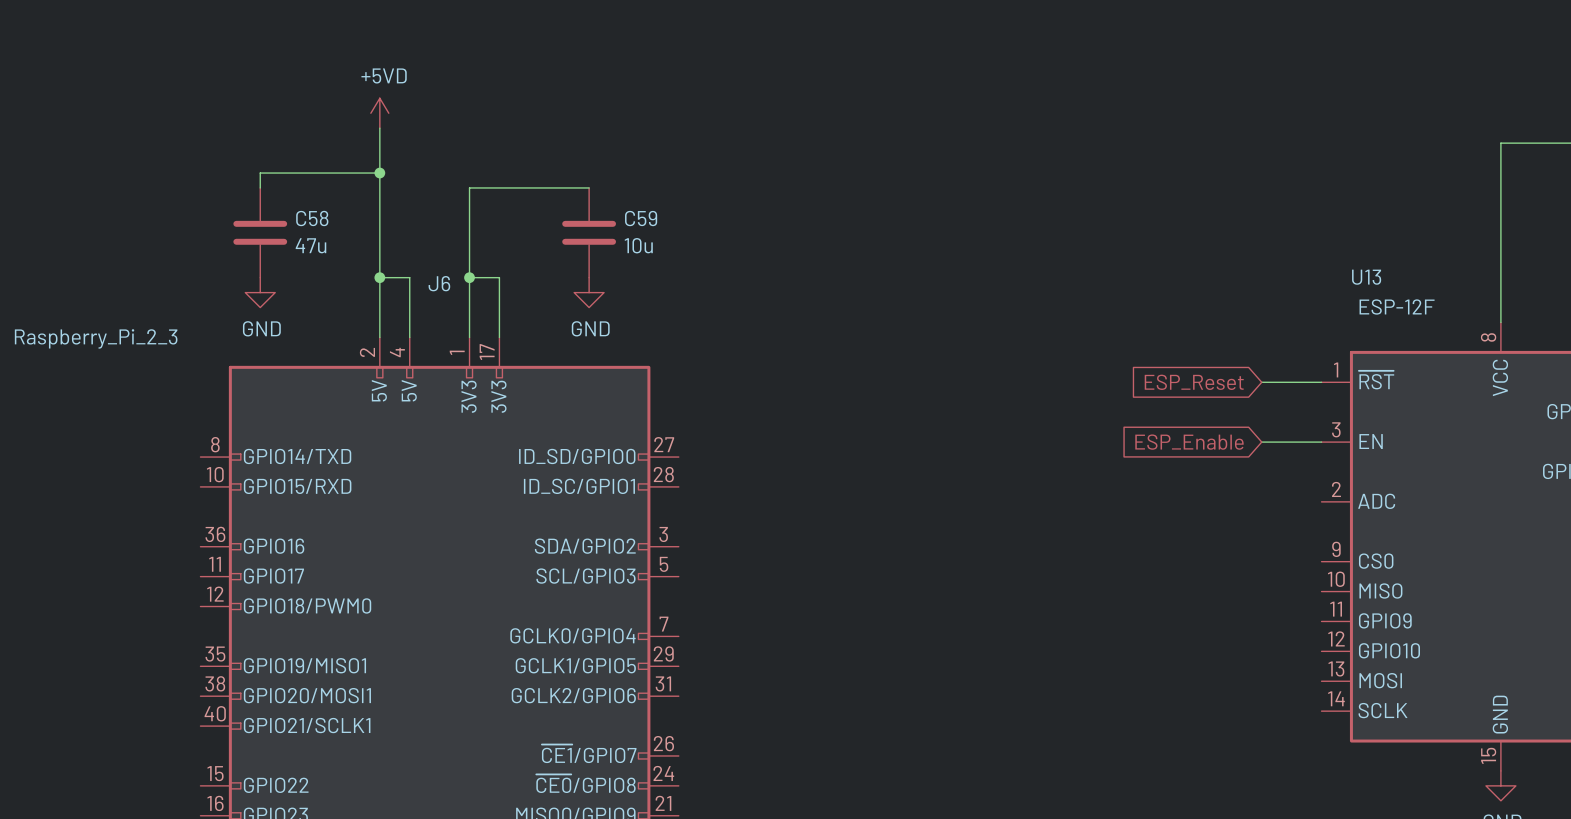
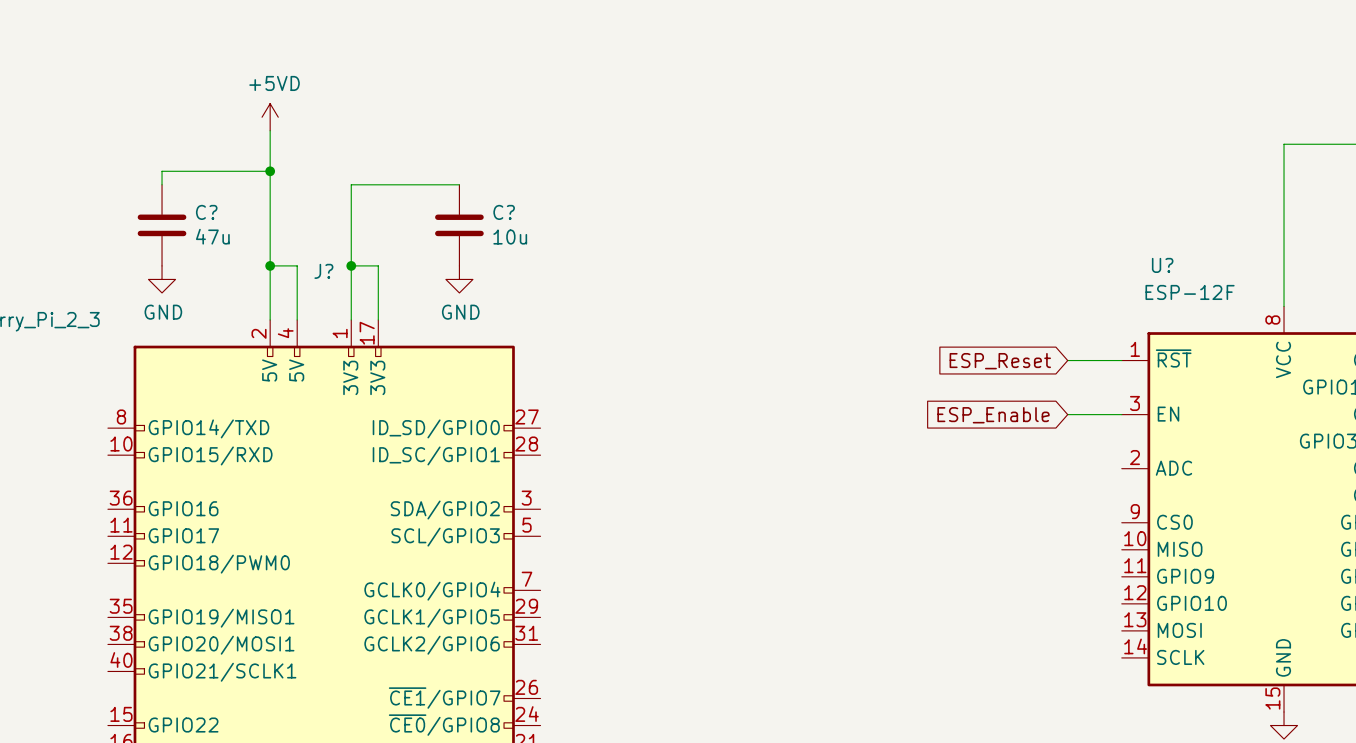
C58 name: C58 (312, 218) -> C? (206, 212)
C59 name: C59 (641, 218) -> C? (504, 212)
U13 name: U13 (1366, 277) -> U? (1162, 265)
J6 name: J6 (439, 283) -> J? (323, 271)

